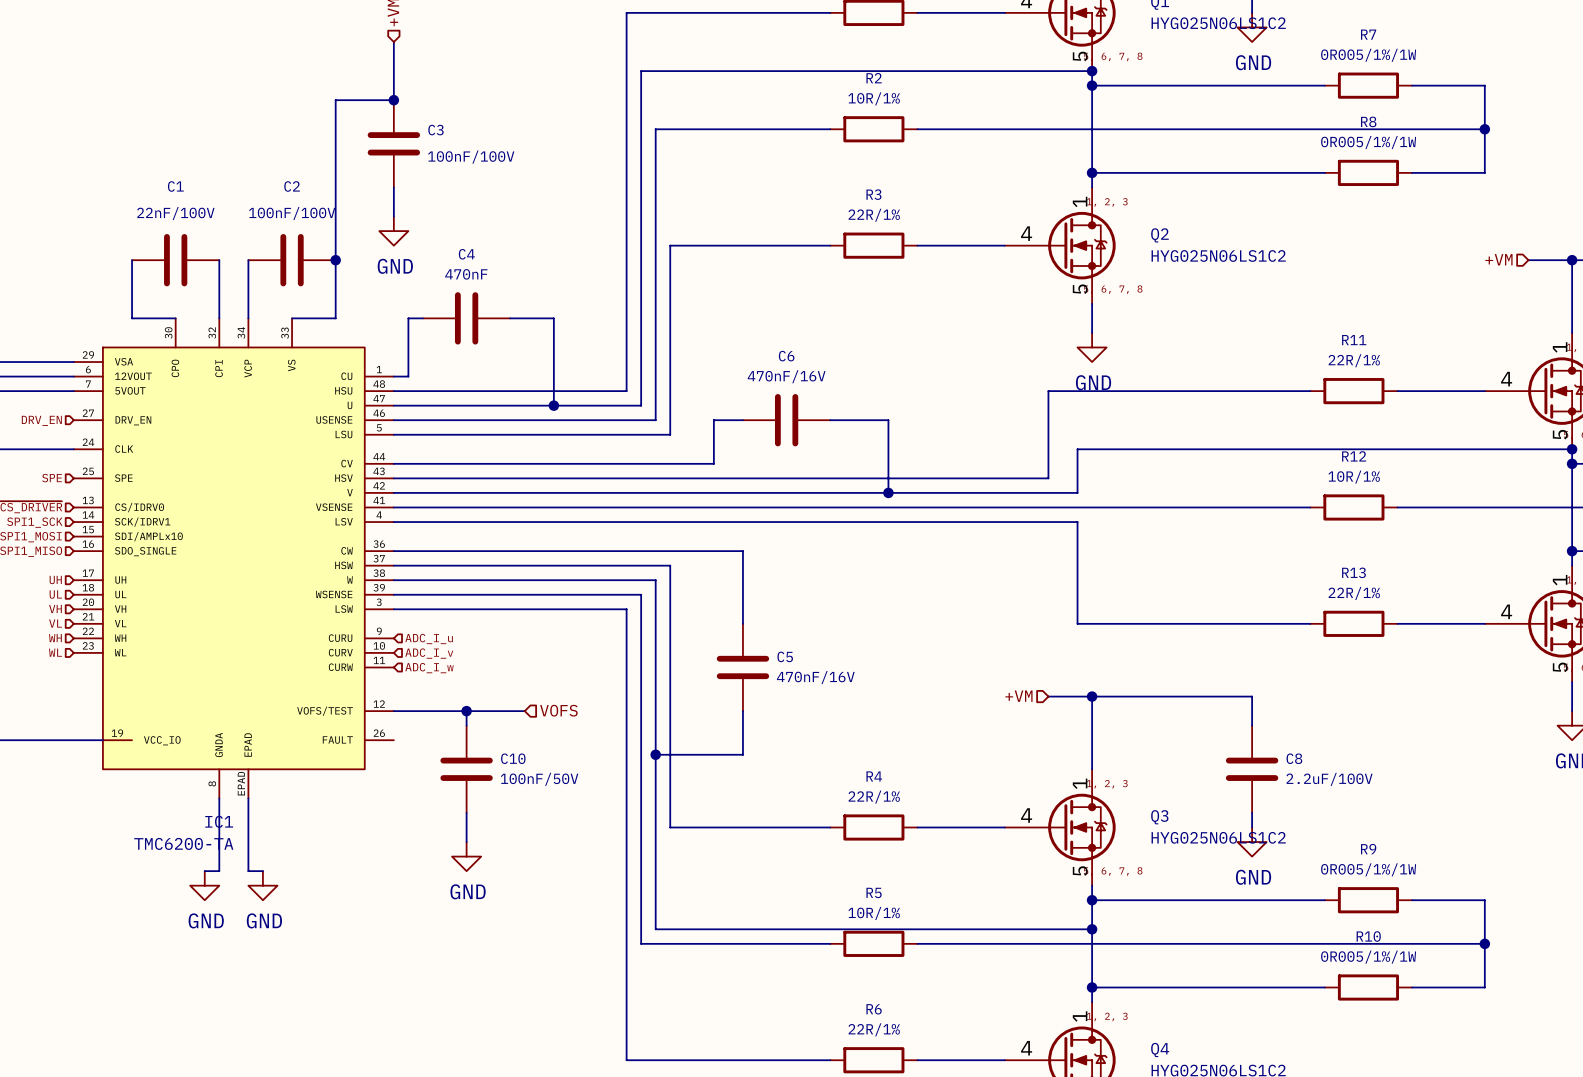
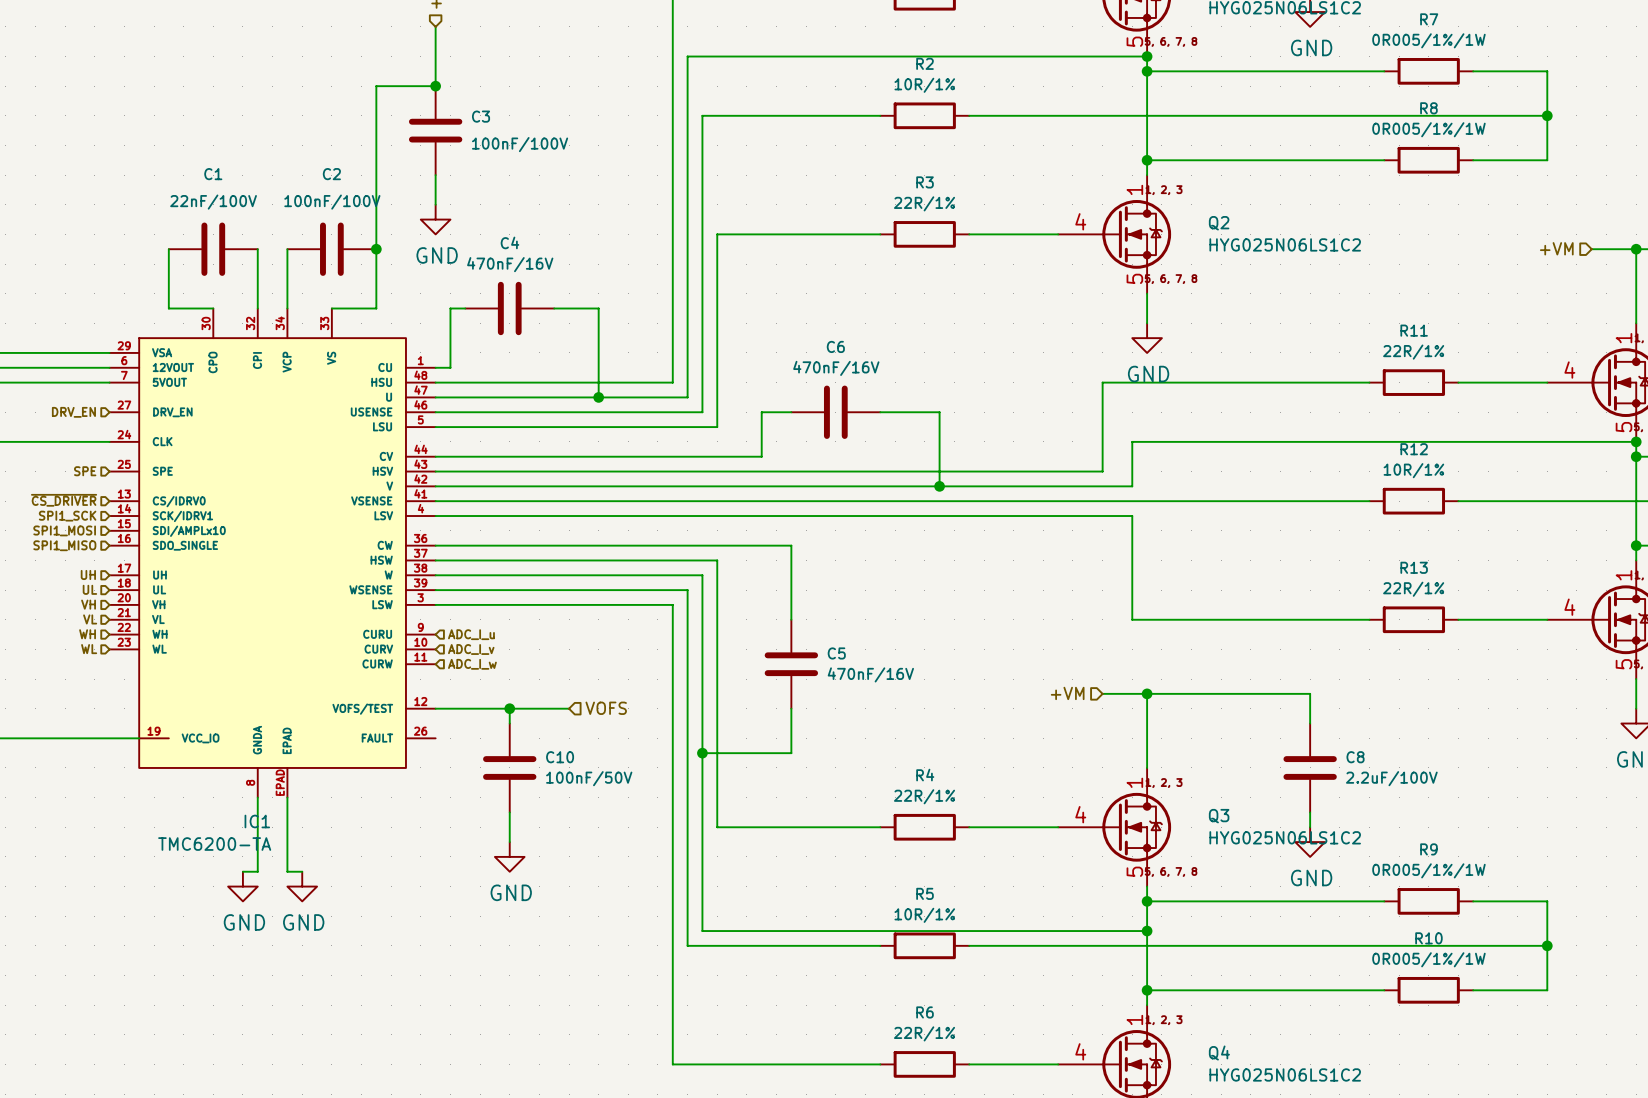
C4 value: 470nF (466, 274) -> 470nF/16V (510, 264)

